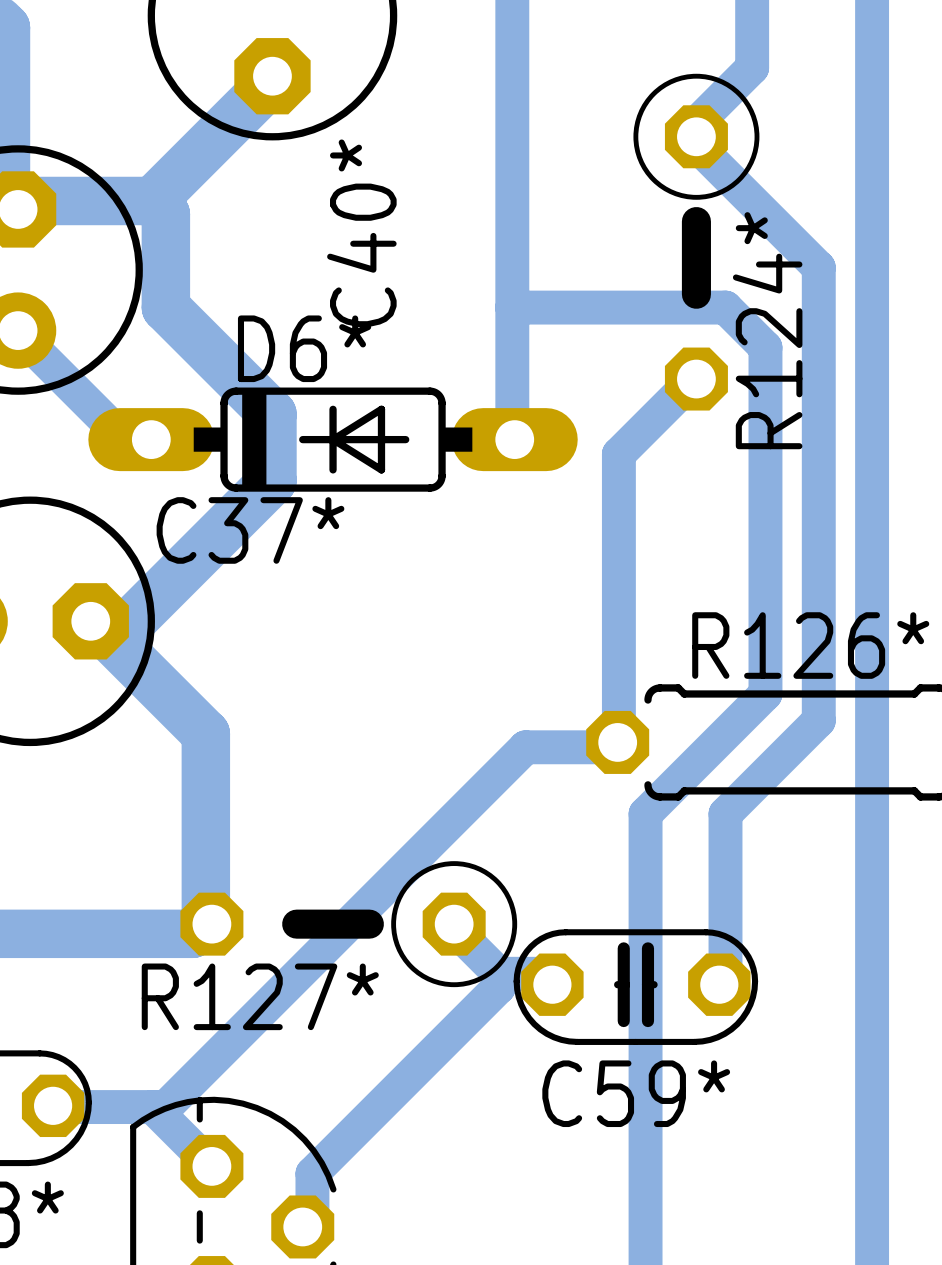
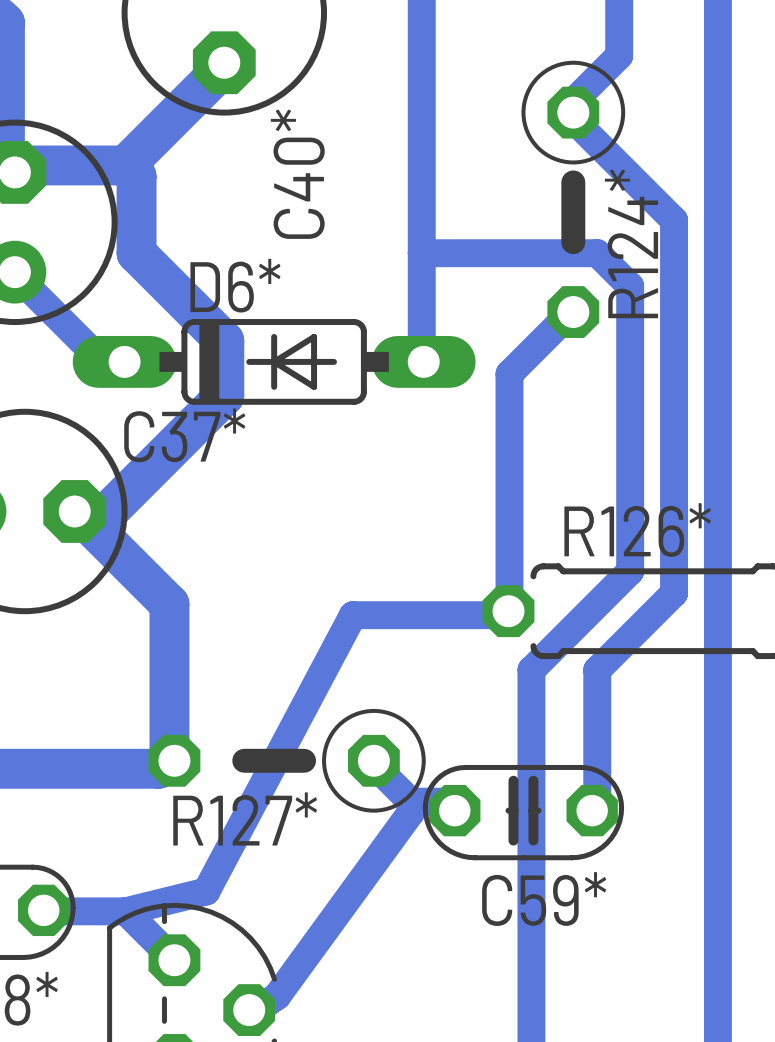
bottom track: (525, 747) (165, 1107) (152, 1107) -> (432, 615) (352, 615) (206, 891) (125, 911)
bottom track: (498, 987) (312, 1173) (312, 1226) -> (410, 812) (277, 996) (257, 1010)

